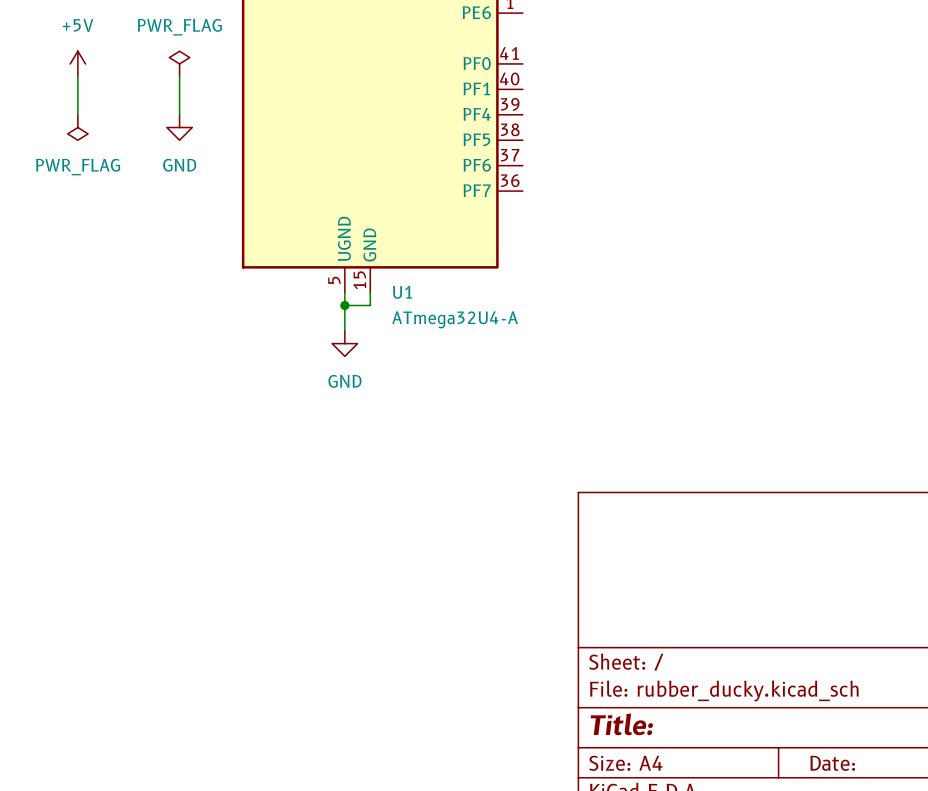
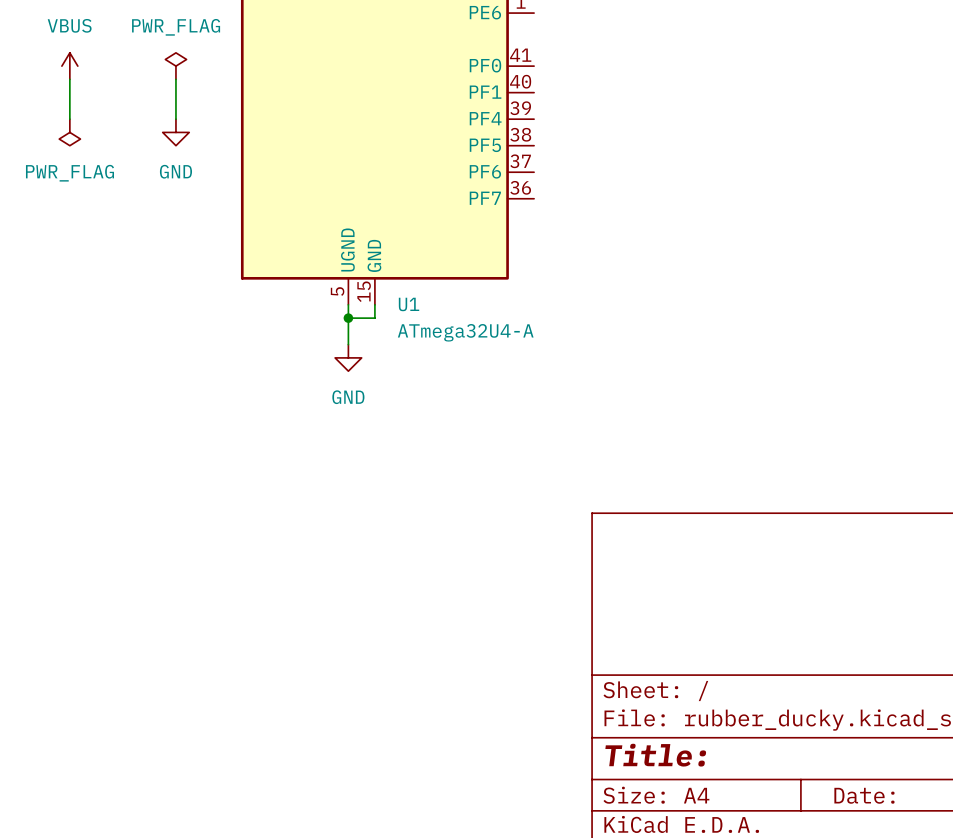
power symbol: +5V (77, 63) -> VBUS (69, 66)

